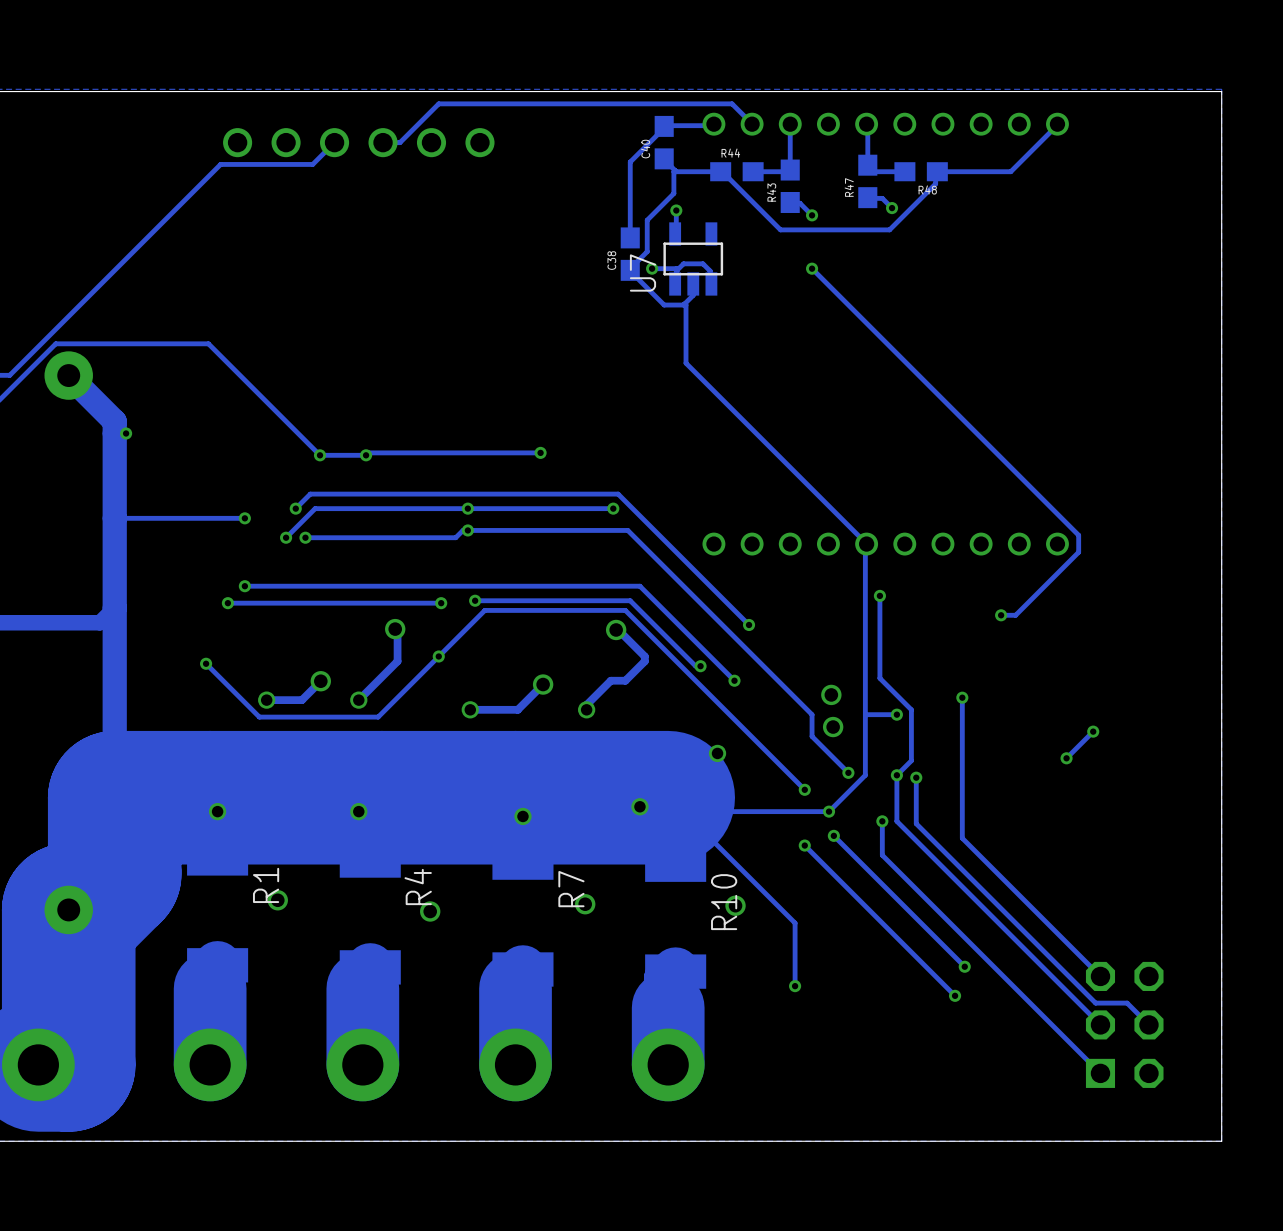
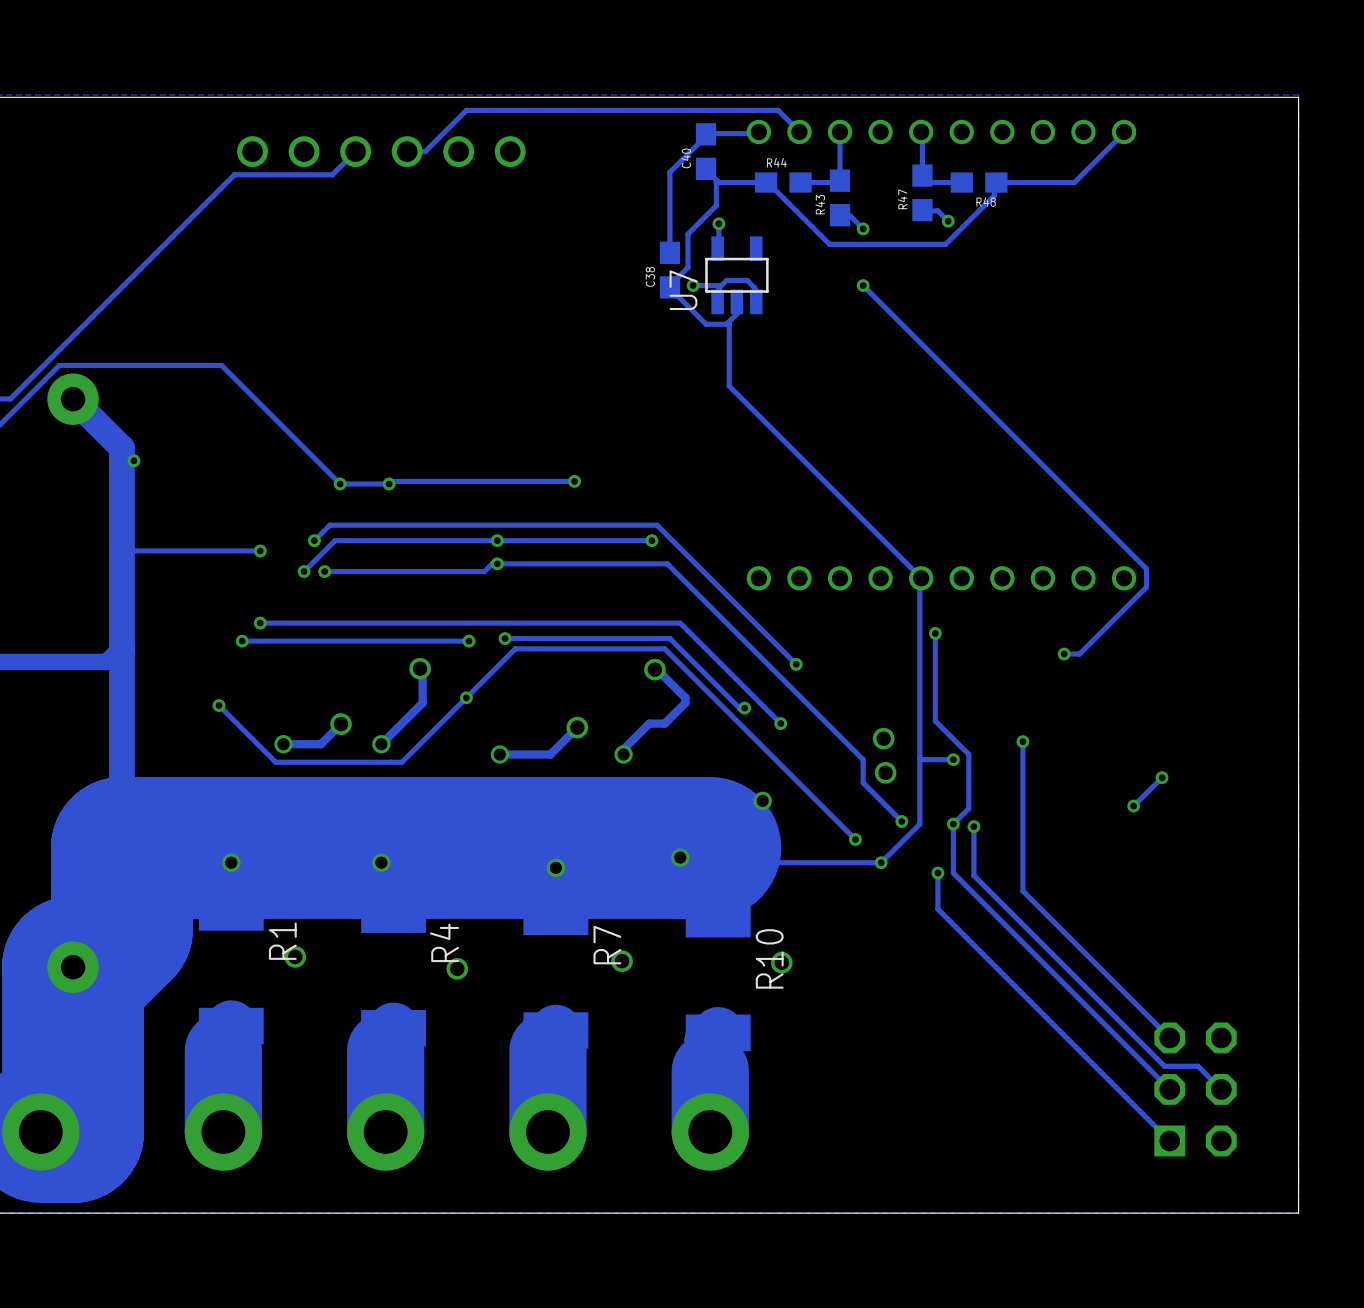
track: (675, 826) (680, 831) (702, 831) (795, 923) (795, 986) -> none
track: (833, 835) (964, 966) -> none
via: (833, 835) -> none
track: (804, 845) (955, 995) -> none
via: (804, 845) -> none
via: (964, 966) -> none
via: (795, 986) -> none
via: (955, 995) -> none

